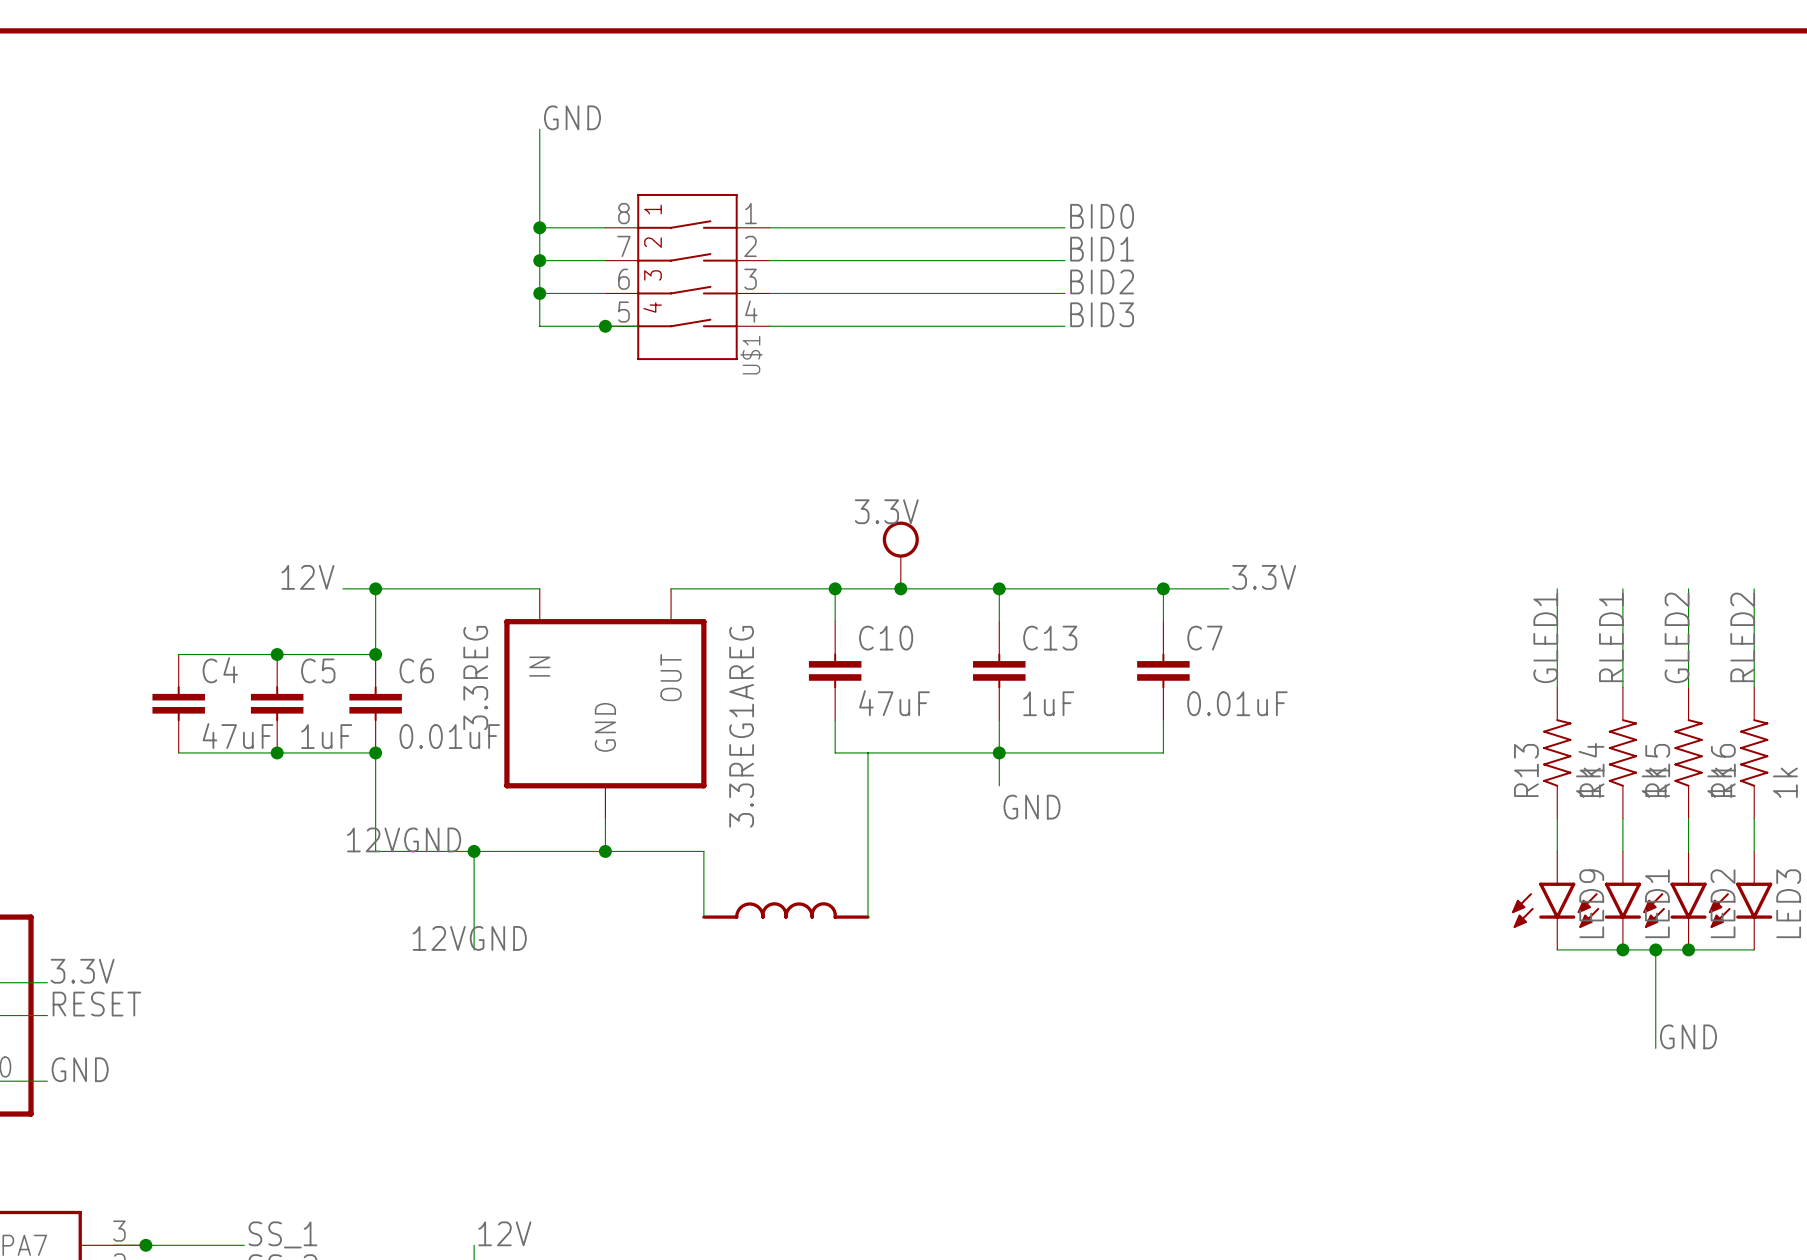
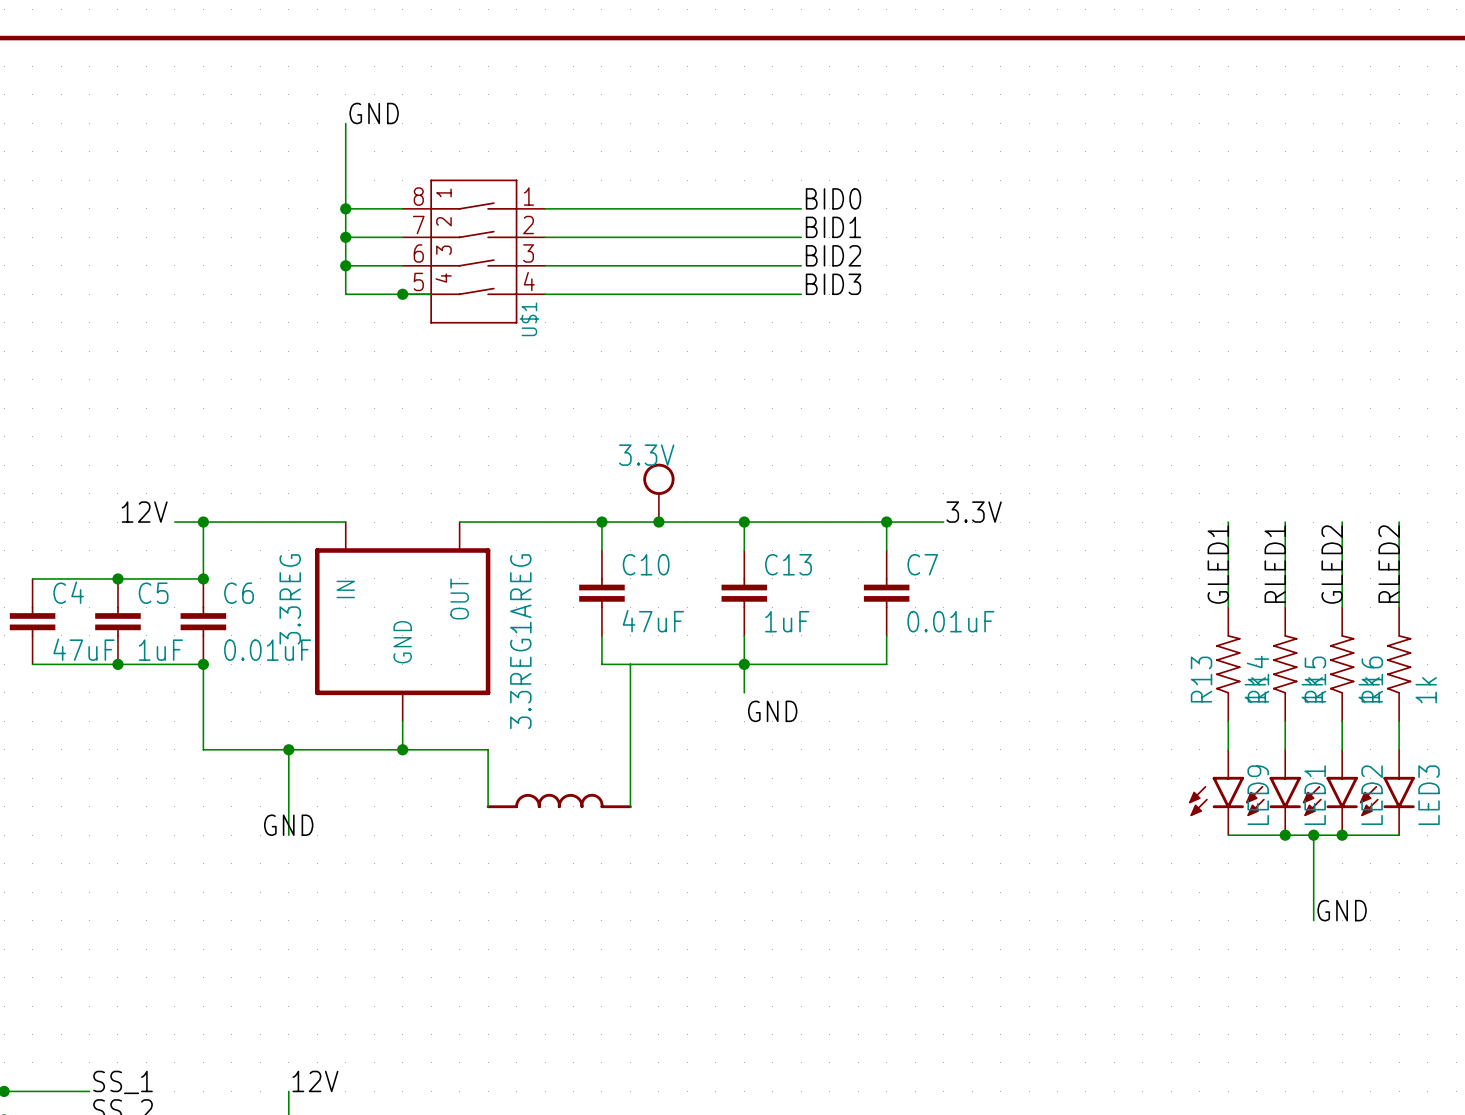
label: 12VGND (404, 839) -> none
label: 12VGND (469, 938) -> GND (288, 825)

